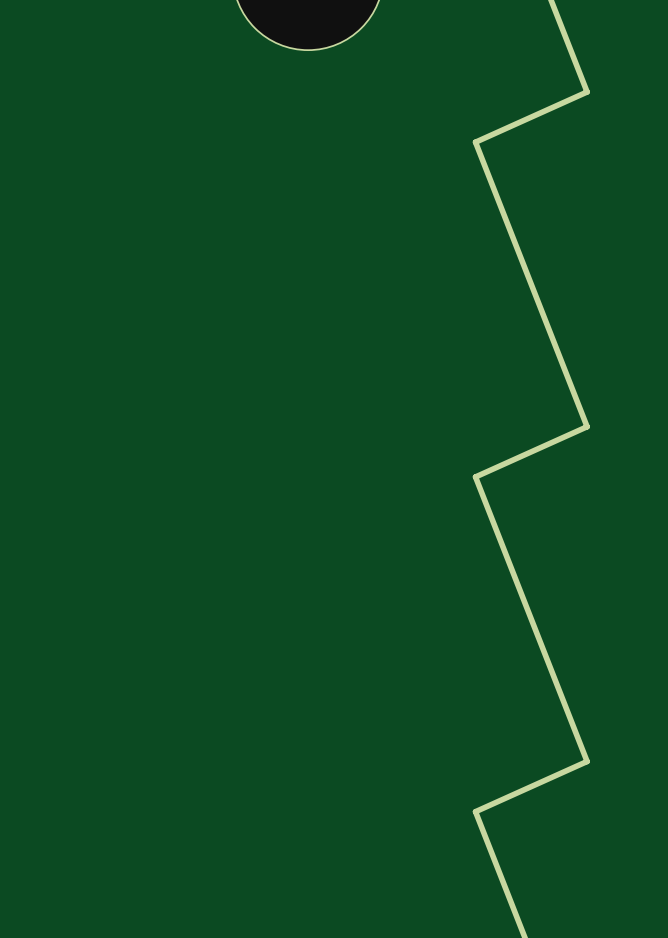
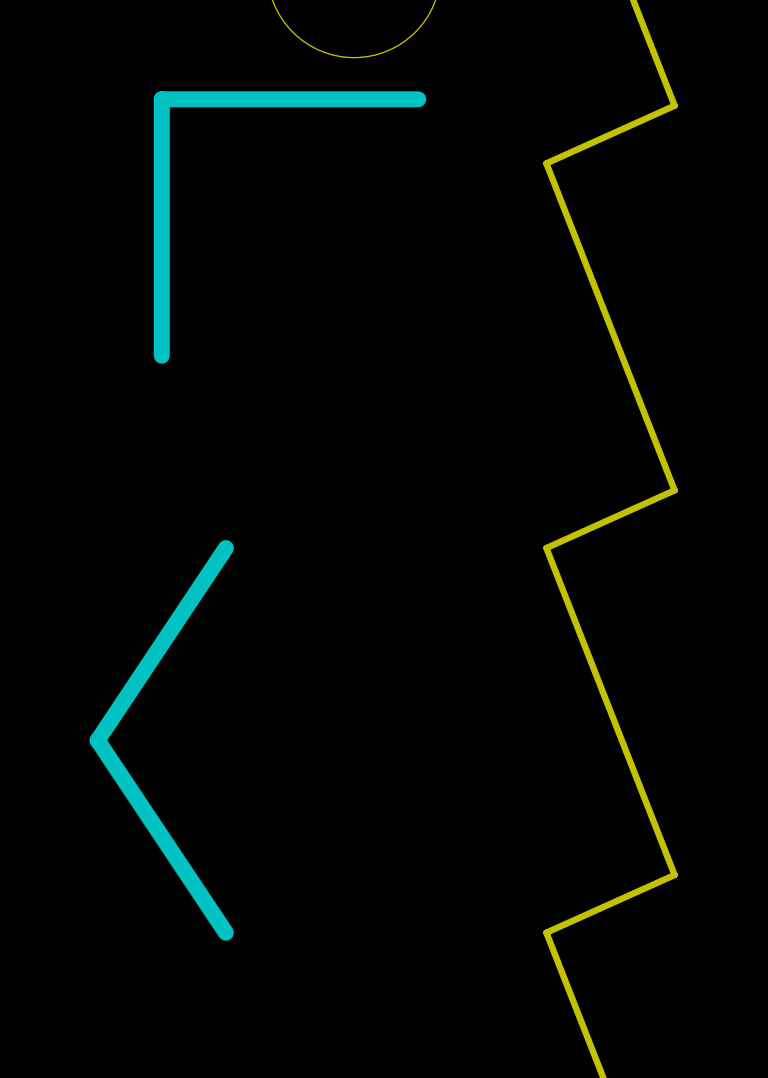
line: none -> (418, 99) (161, 99) (161, 355)
line: none -> (225, 548) (97, 740) (225, 932)

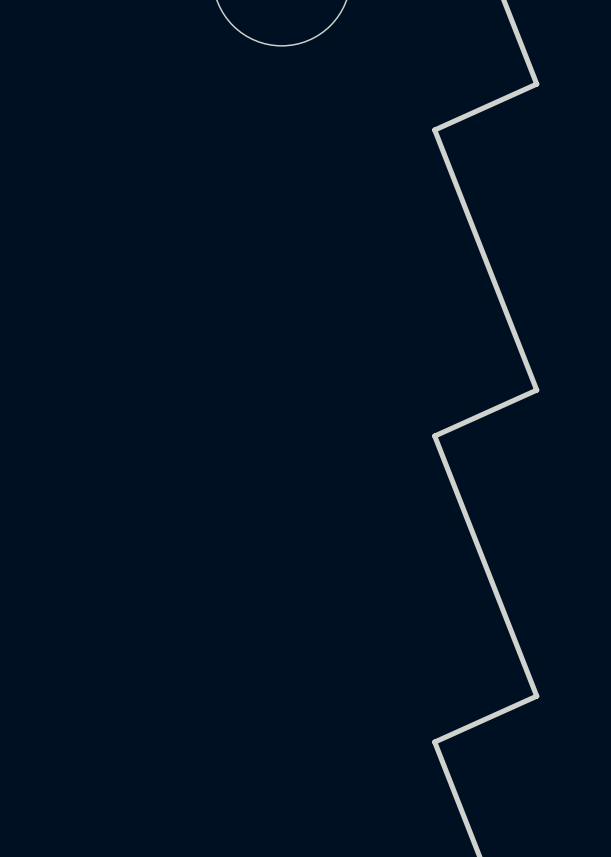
line: (418, 99) (161, 99) (161, 355) -> none
line: (225, 548) (97, 740) (225, 932) -> none

